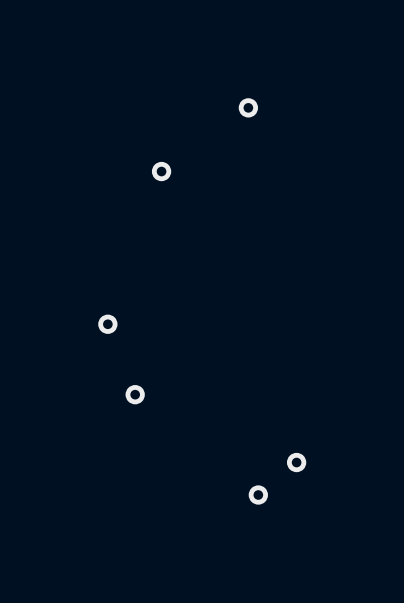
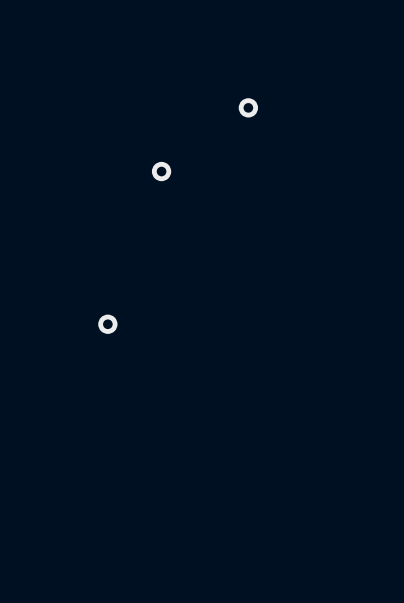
via: (135, 394) -> none
via: (296, 462) -> none
via: (258, 495) -> none

